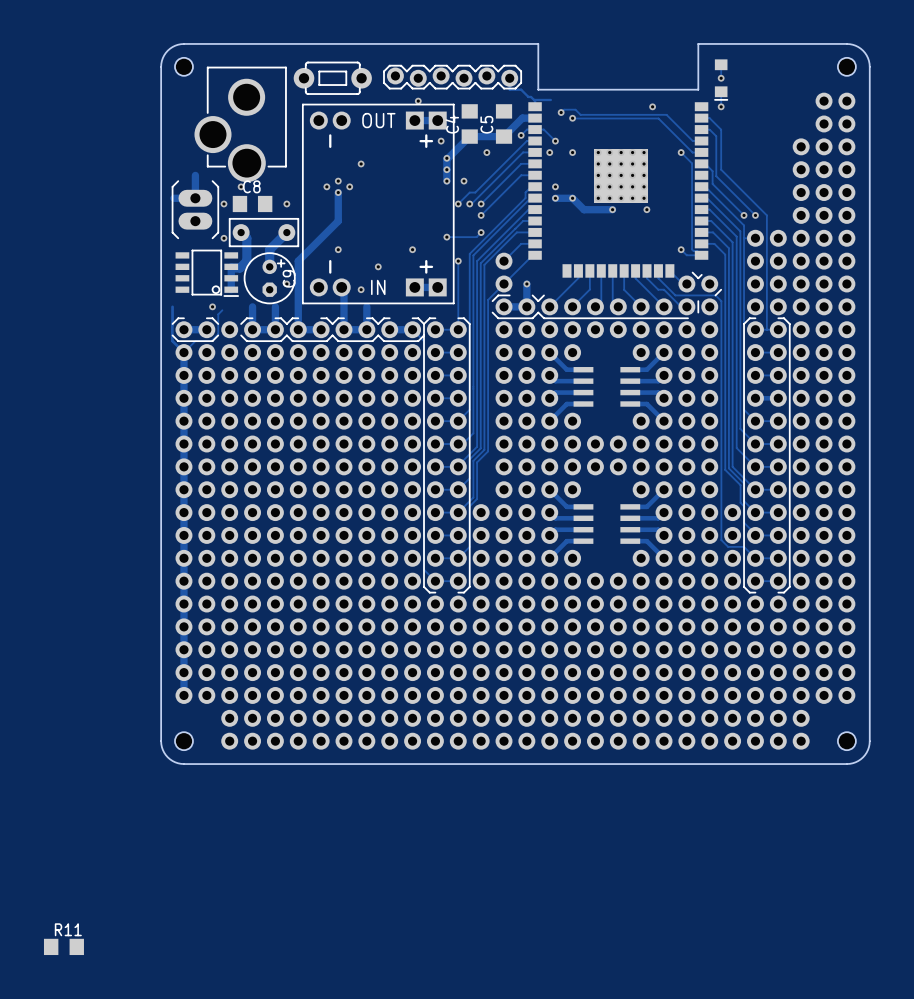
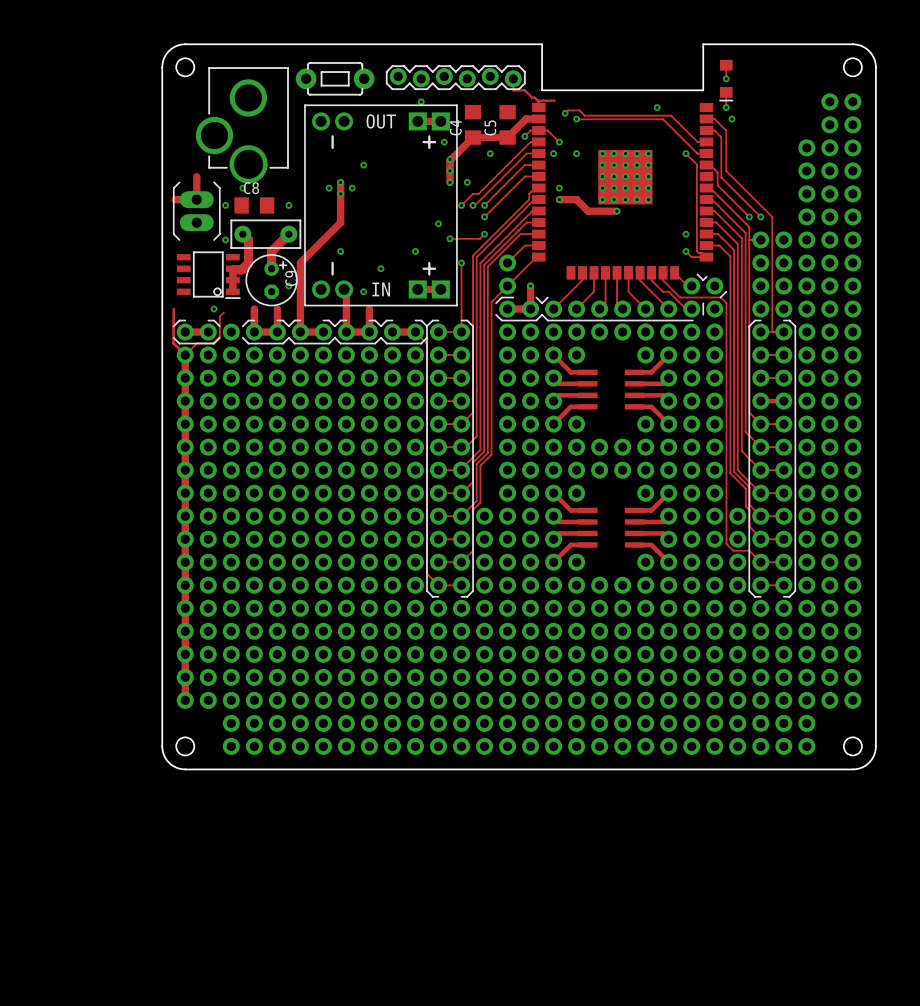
via: none -> (732, 119)
track: none -> (340, 182) (340, 193)
via: (572, 198) -> none
via position: (646, 209) -> (685, 234)
via: none -> (438, 223)
R11: (63, 946) -> none

